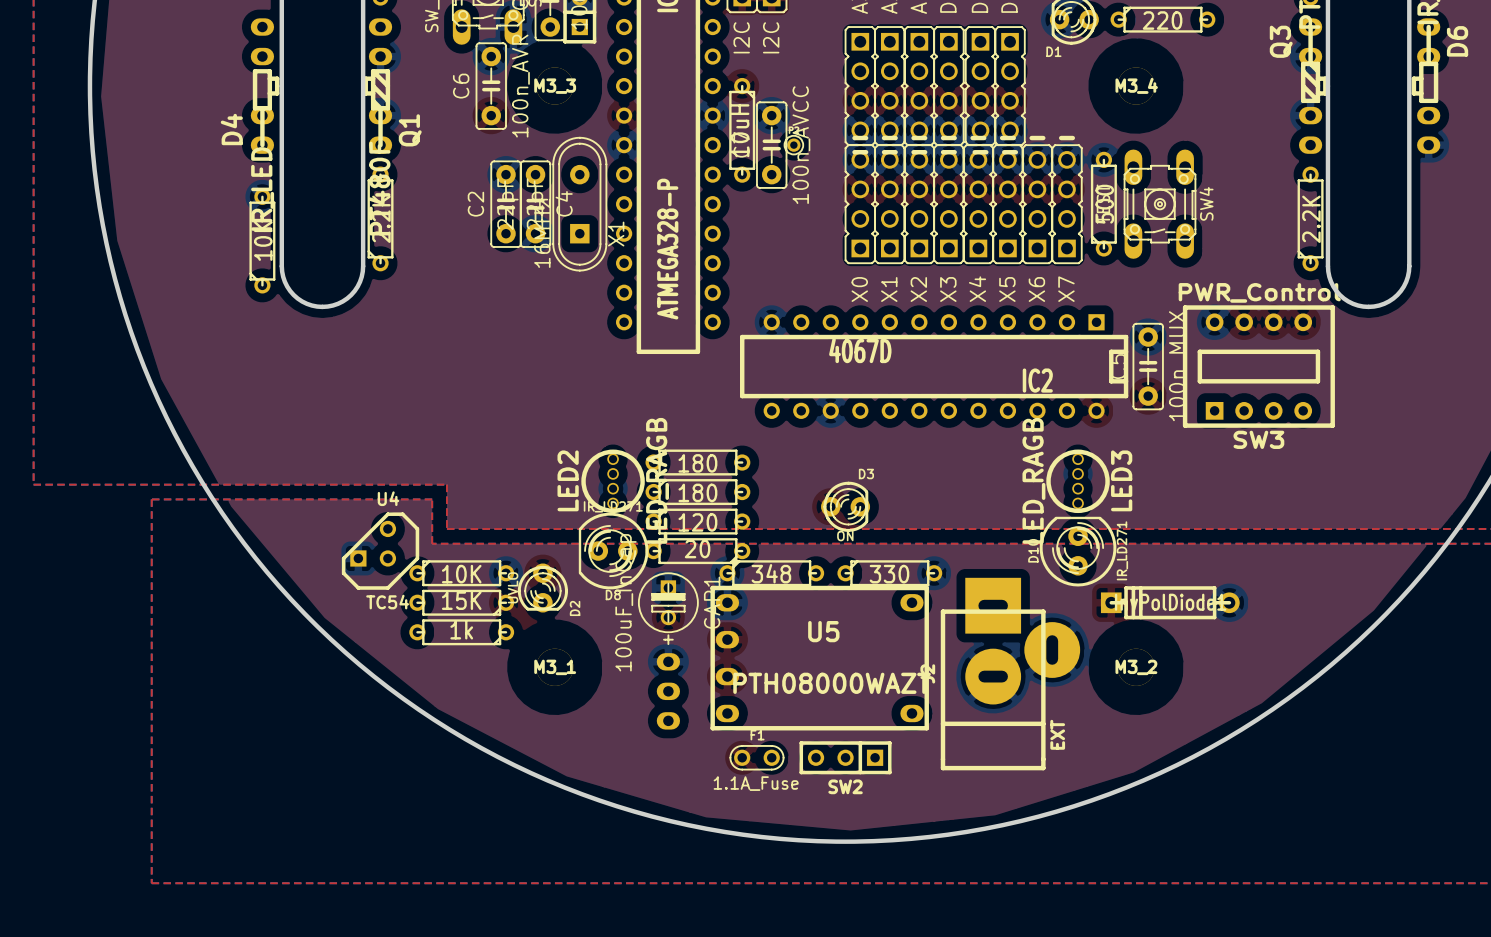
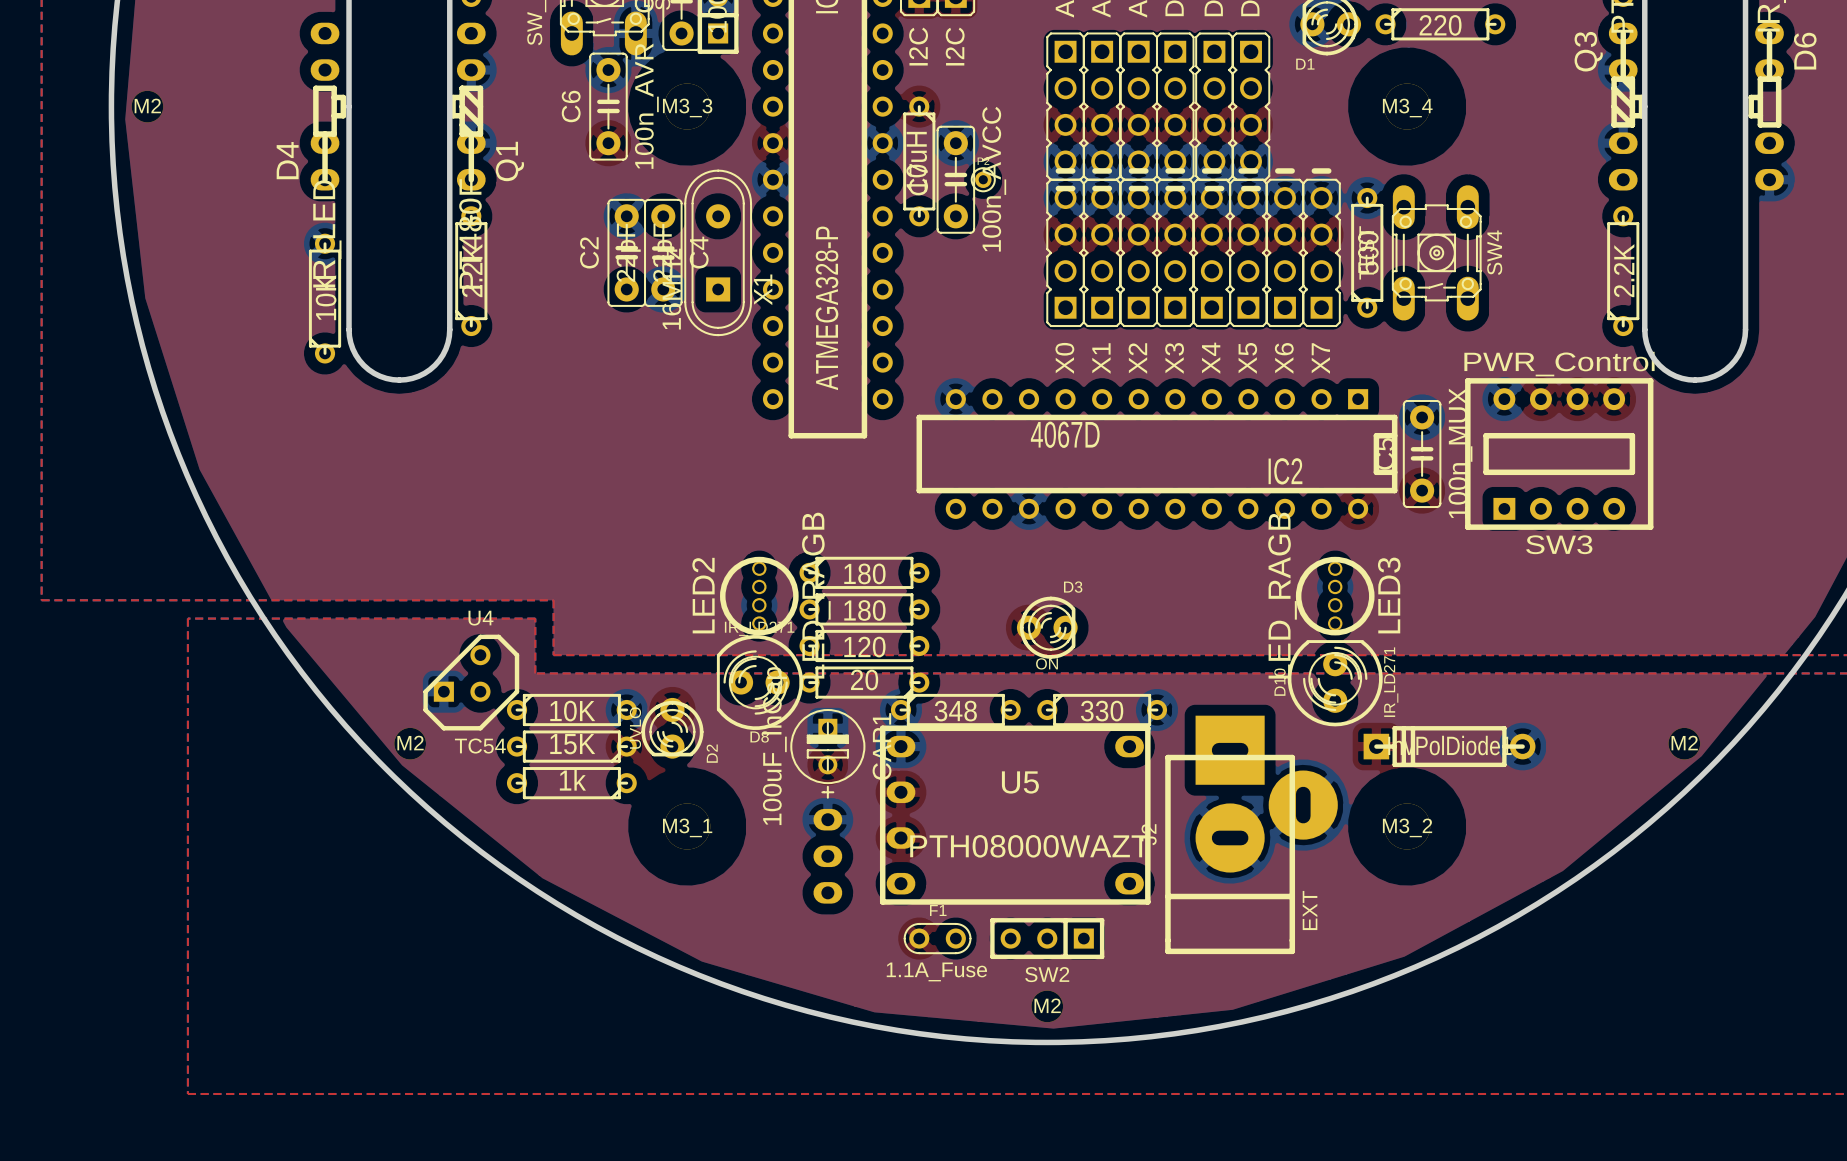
M2: none -> (147, 106)
M2: none -> (410, 743)
M2: none -> (1684, 743)
M2: none -> (1047, 1006)

